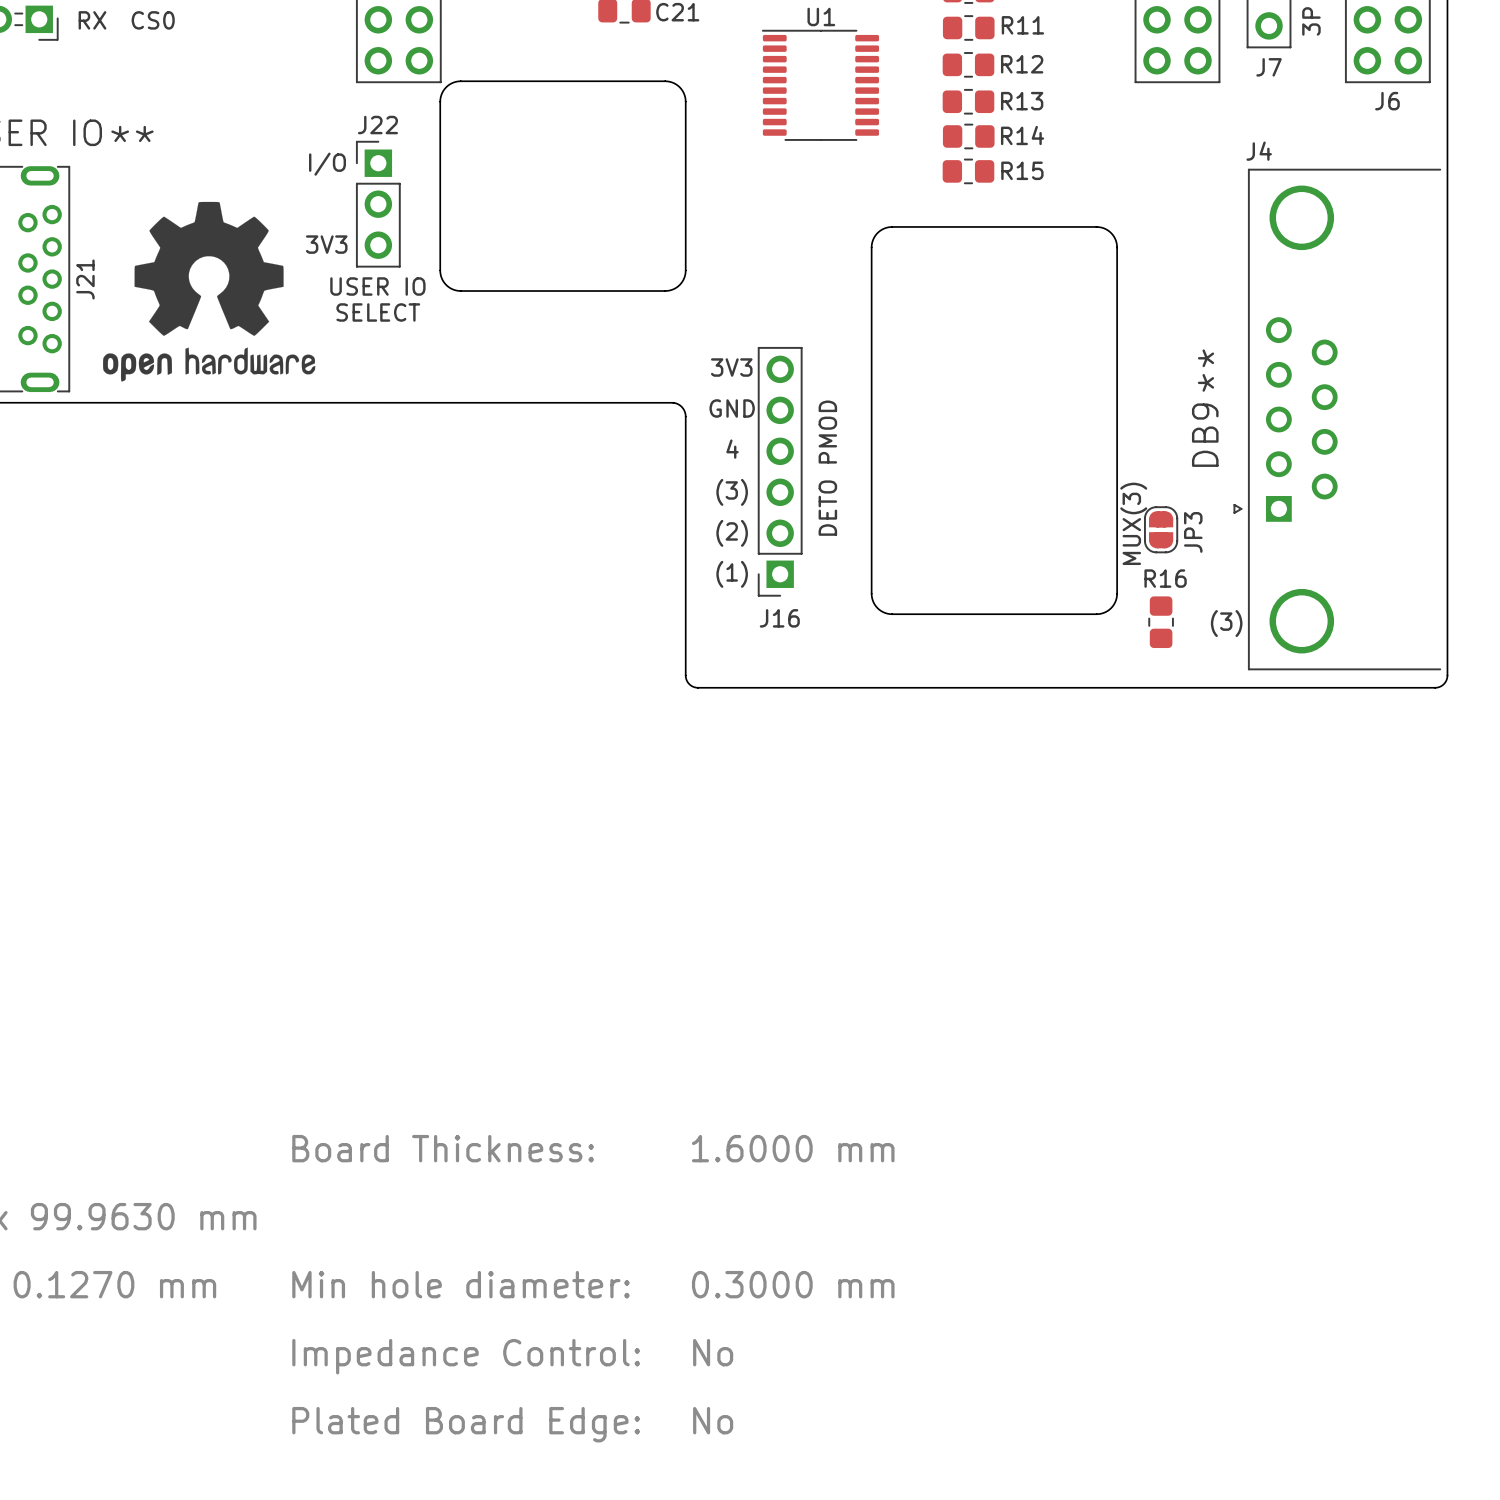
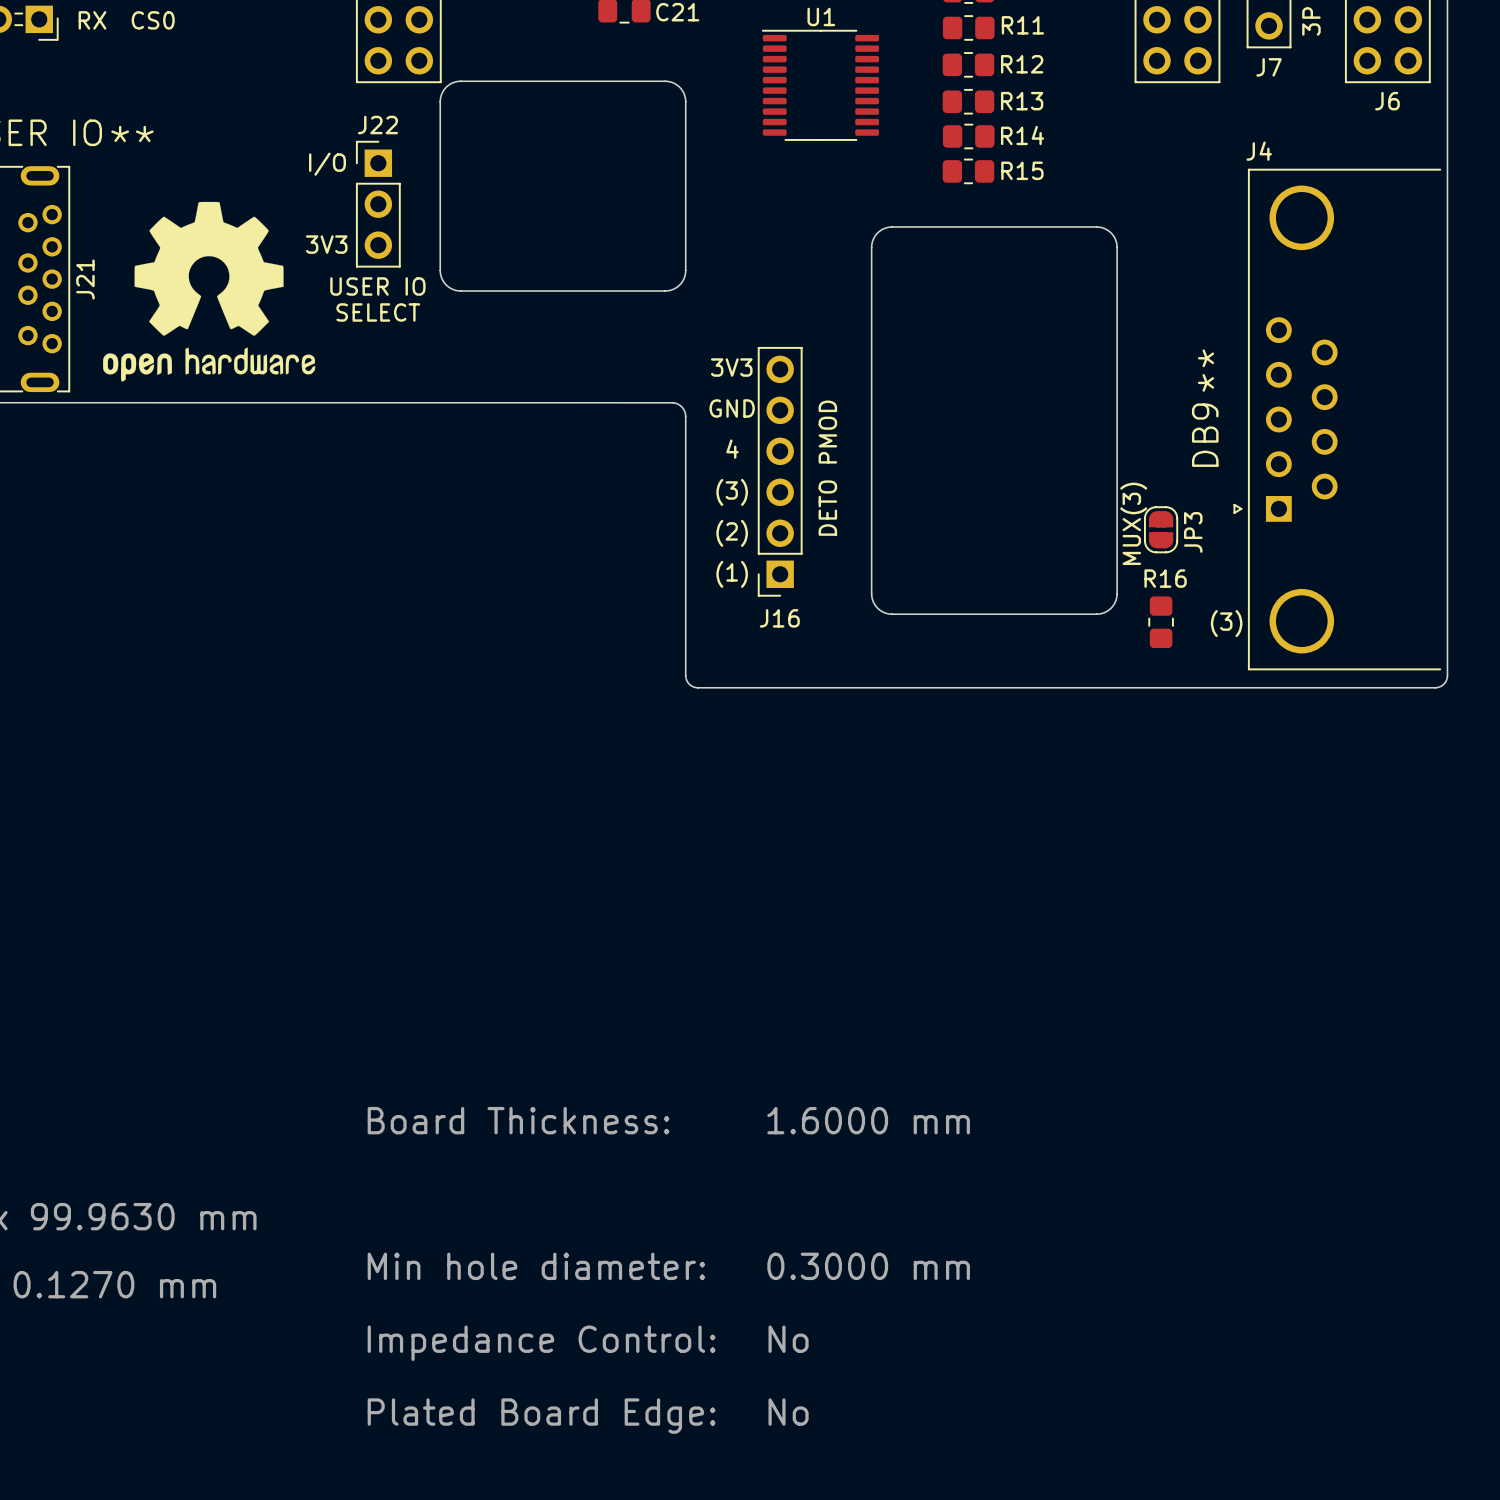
text position: Board Thickness: (443, 1148) -> Board Thickness: (518, 1120)
text position: 1.6000 mm (793, 1148) -> 1.6000 mm (868, 1120)
text position: Min hole diameter: (460, 1284) -> Min hole diameter: (536, 1266)
text position: 0.3000 mm (793, 1284) -> 0.3000 mm (868, 1266)
text: none -> No (788, 1339)
text: No (713, 1352) -> none
text position: Impedance Control: (466, 1356) -> Impedance Control: (541, 1343)
text: none -> No (788, 1412)
text: No (713, 1420) -> none
text position: Plated Board Edge: (466, 1424) -> Plated Board Edge: (541, 1416)

